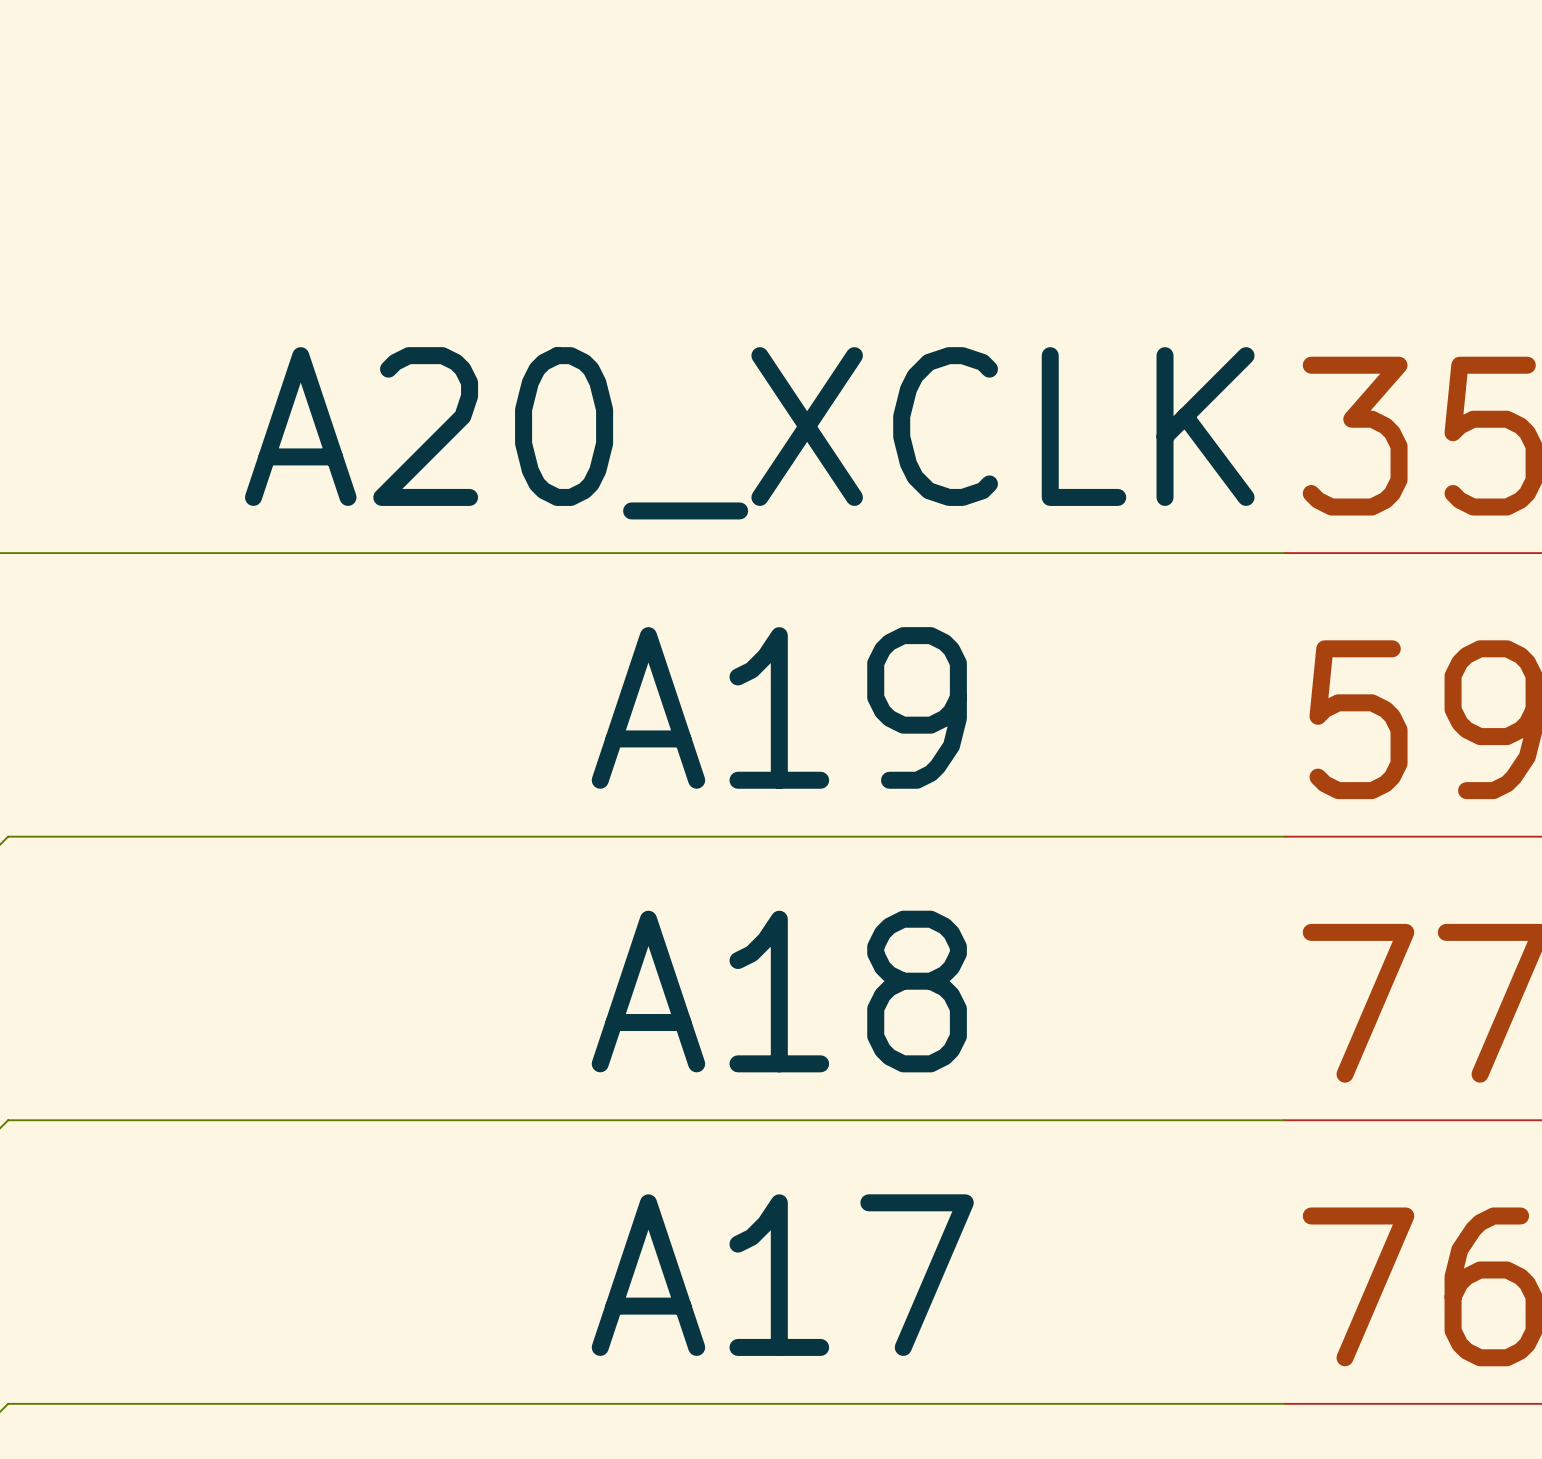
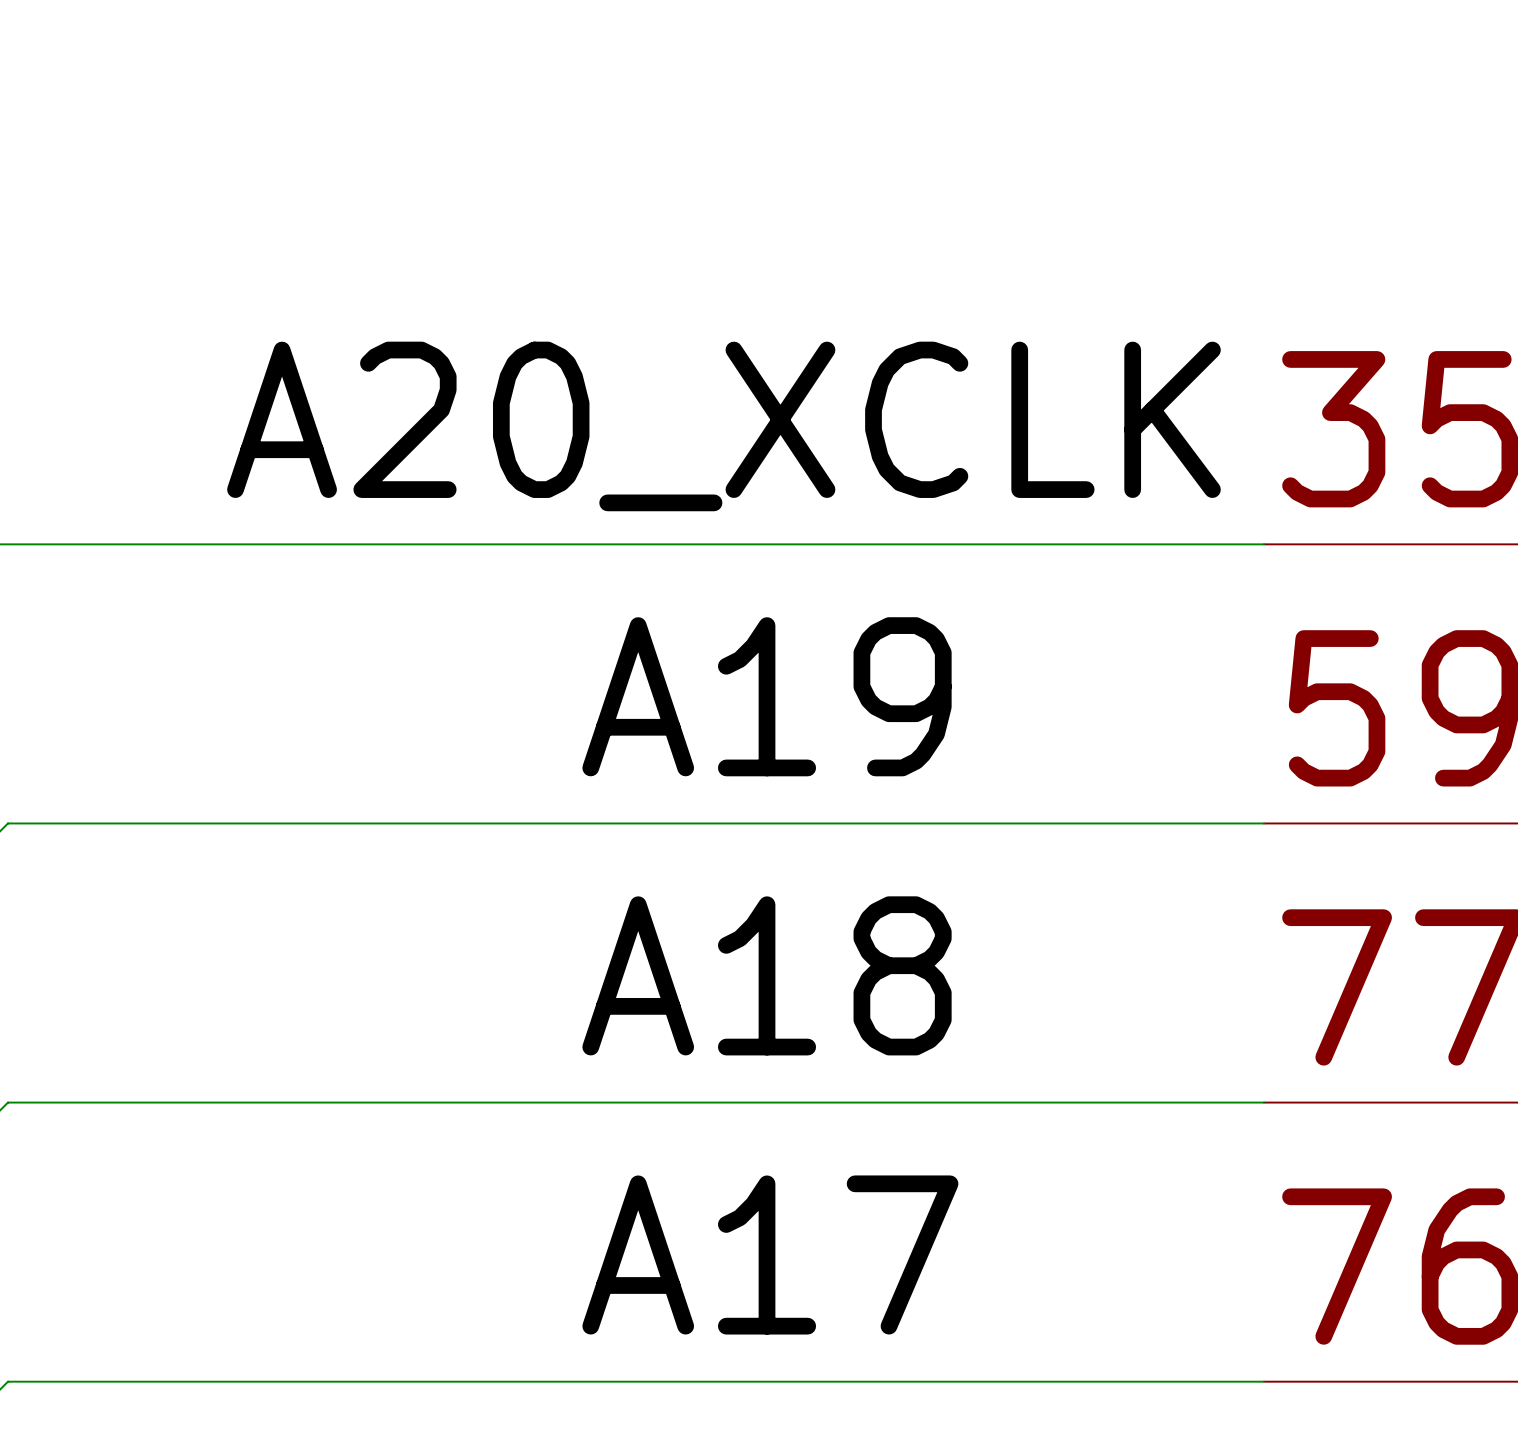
label position: A20_XCLK (749, 433) -> A20_XCLK (723, 426)

